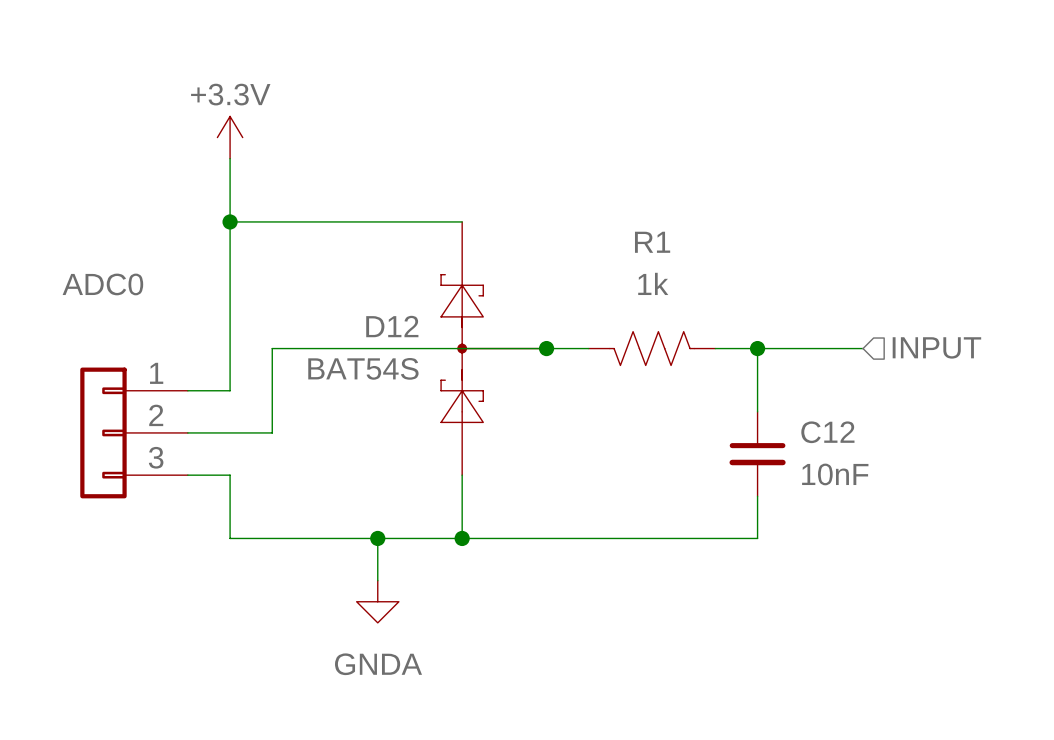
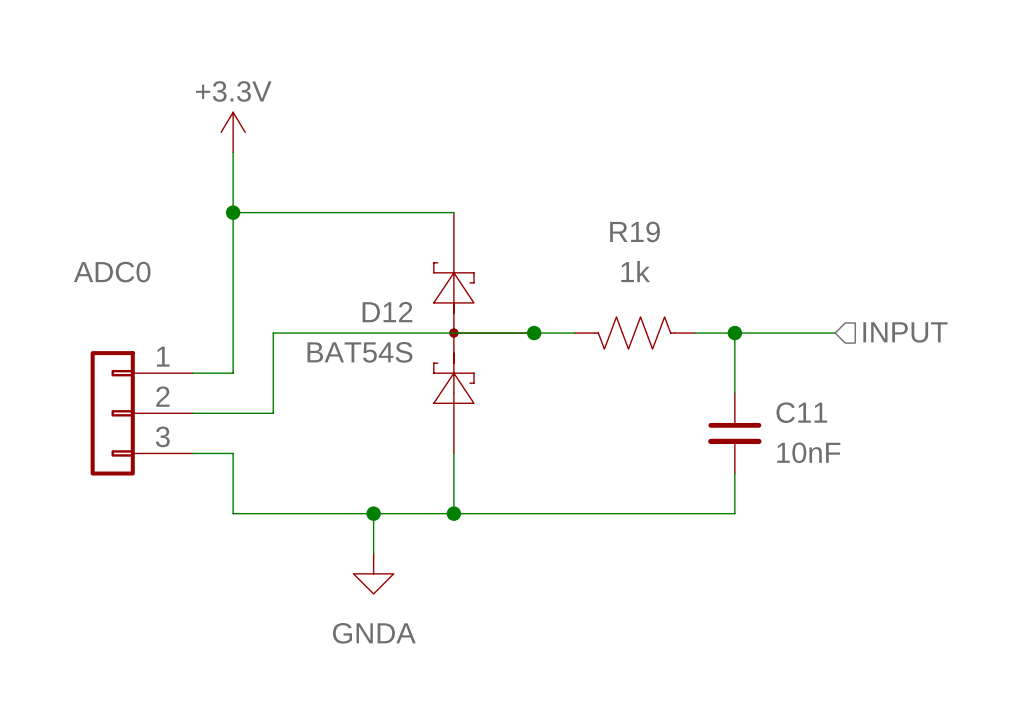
R1 name: R1 (652, 242) -> R19 (635, 231)
C12 name: C12 (827, 432) -> C11 (801, 412)

